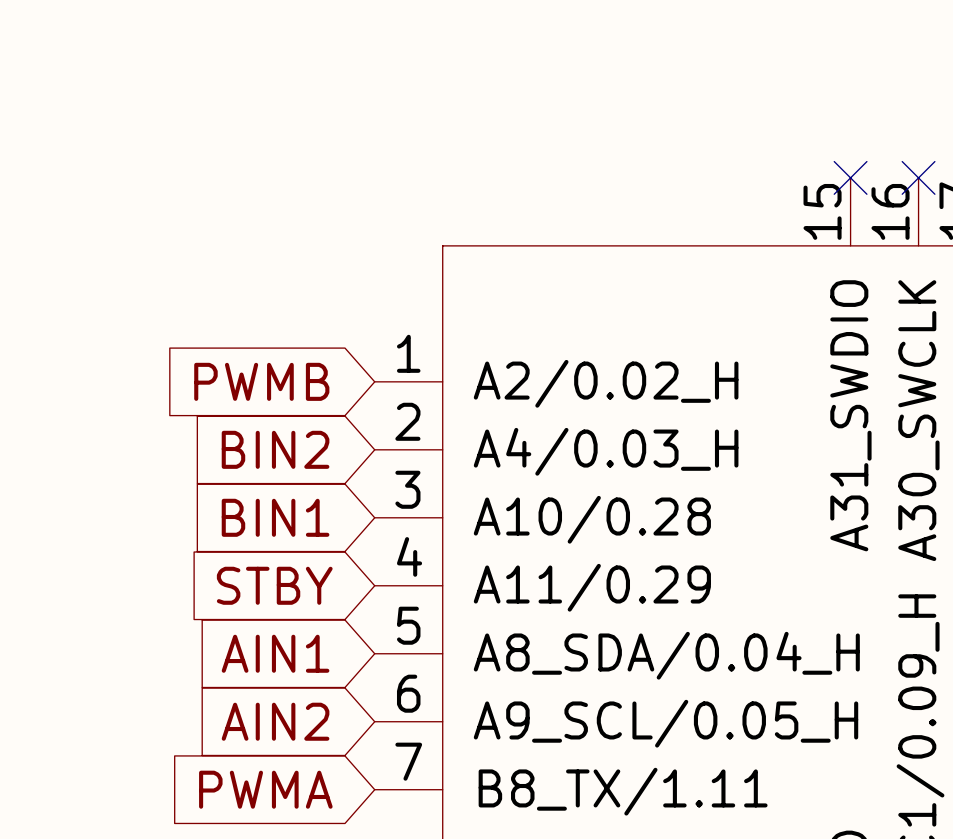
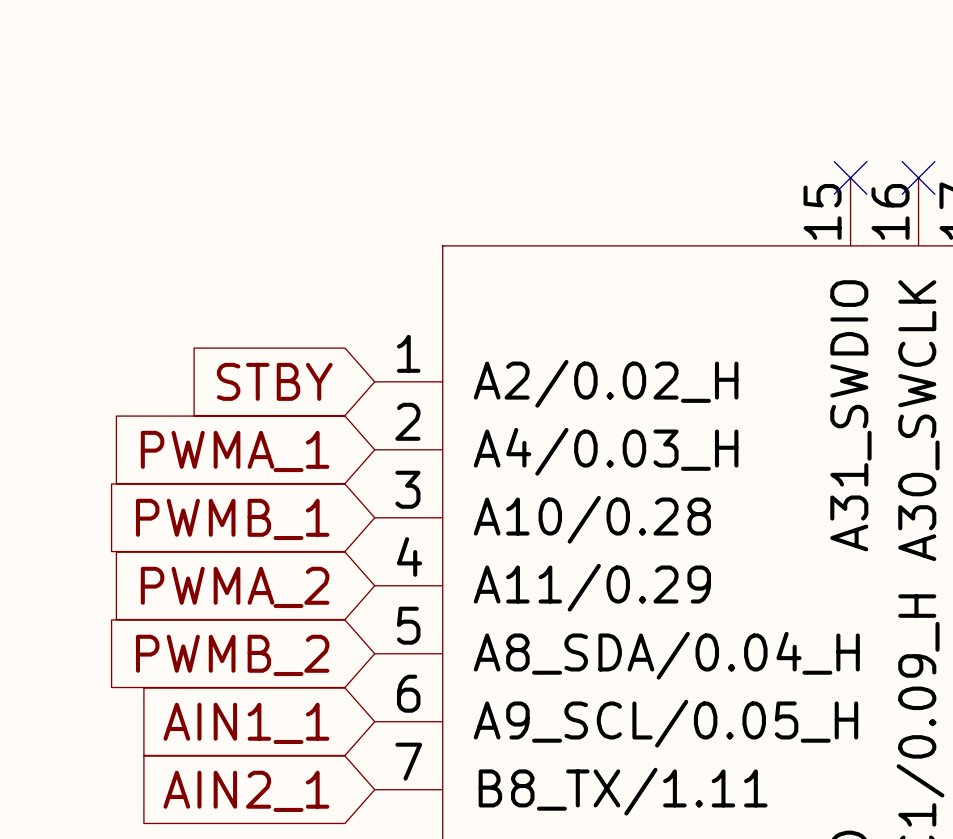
global label: PWMB (261, 381) -> STBY (274, 381)
global label: BIN2 (275, 449) -> PWMA_1 (235, 451)
global label: BIN1 (275, 517) -> PWMB_1 (232, 519)
global label: STBY (274, 585) -> PWMA_2 (235, 587)
global label: AIN1 (275, 653) -> PWMB_2 (232, 655)
global label: AIN2 (275, 721) -> AIN1_1 (246, 723)
global label: PWMA (265, 789) -> AIN2_1 (246, 791)

